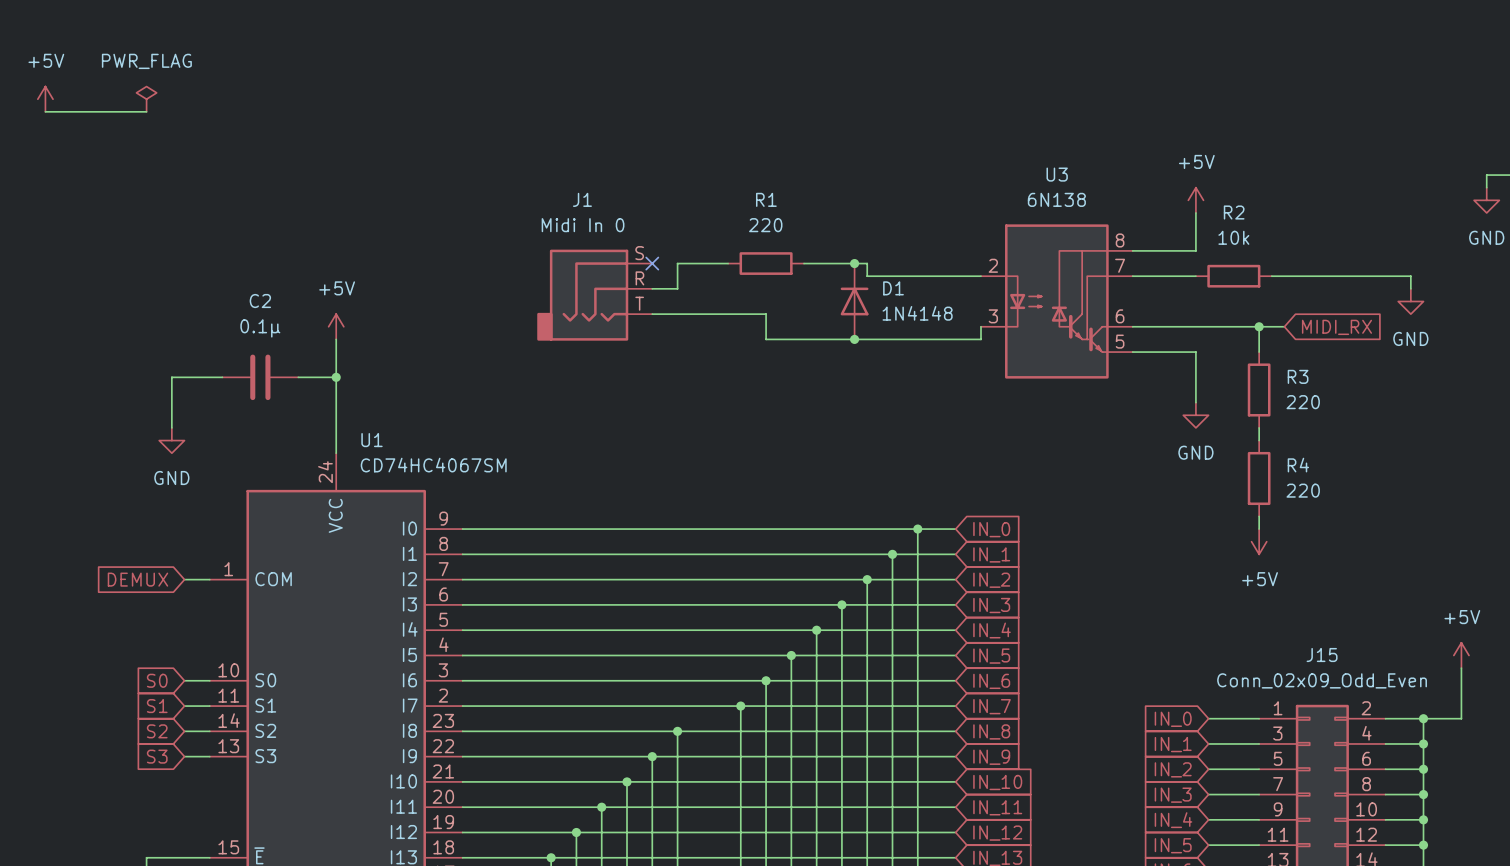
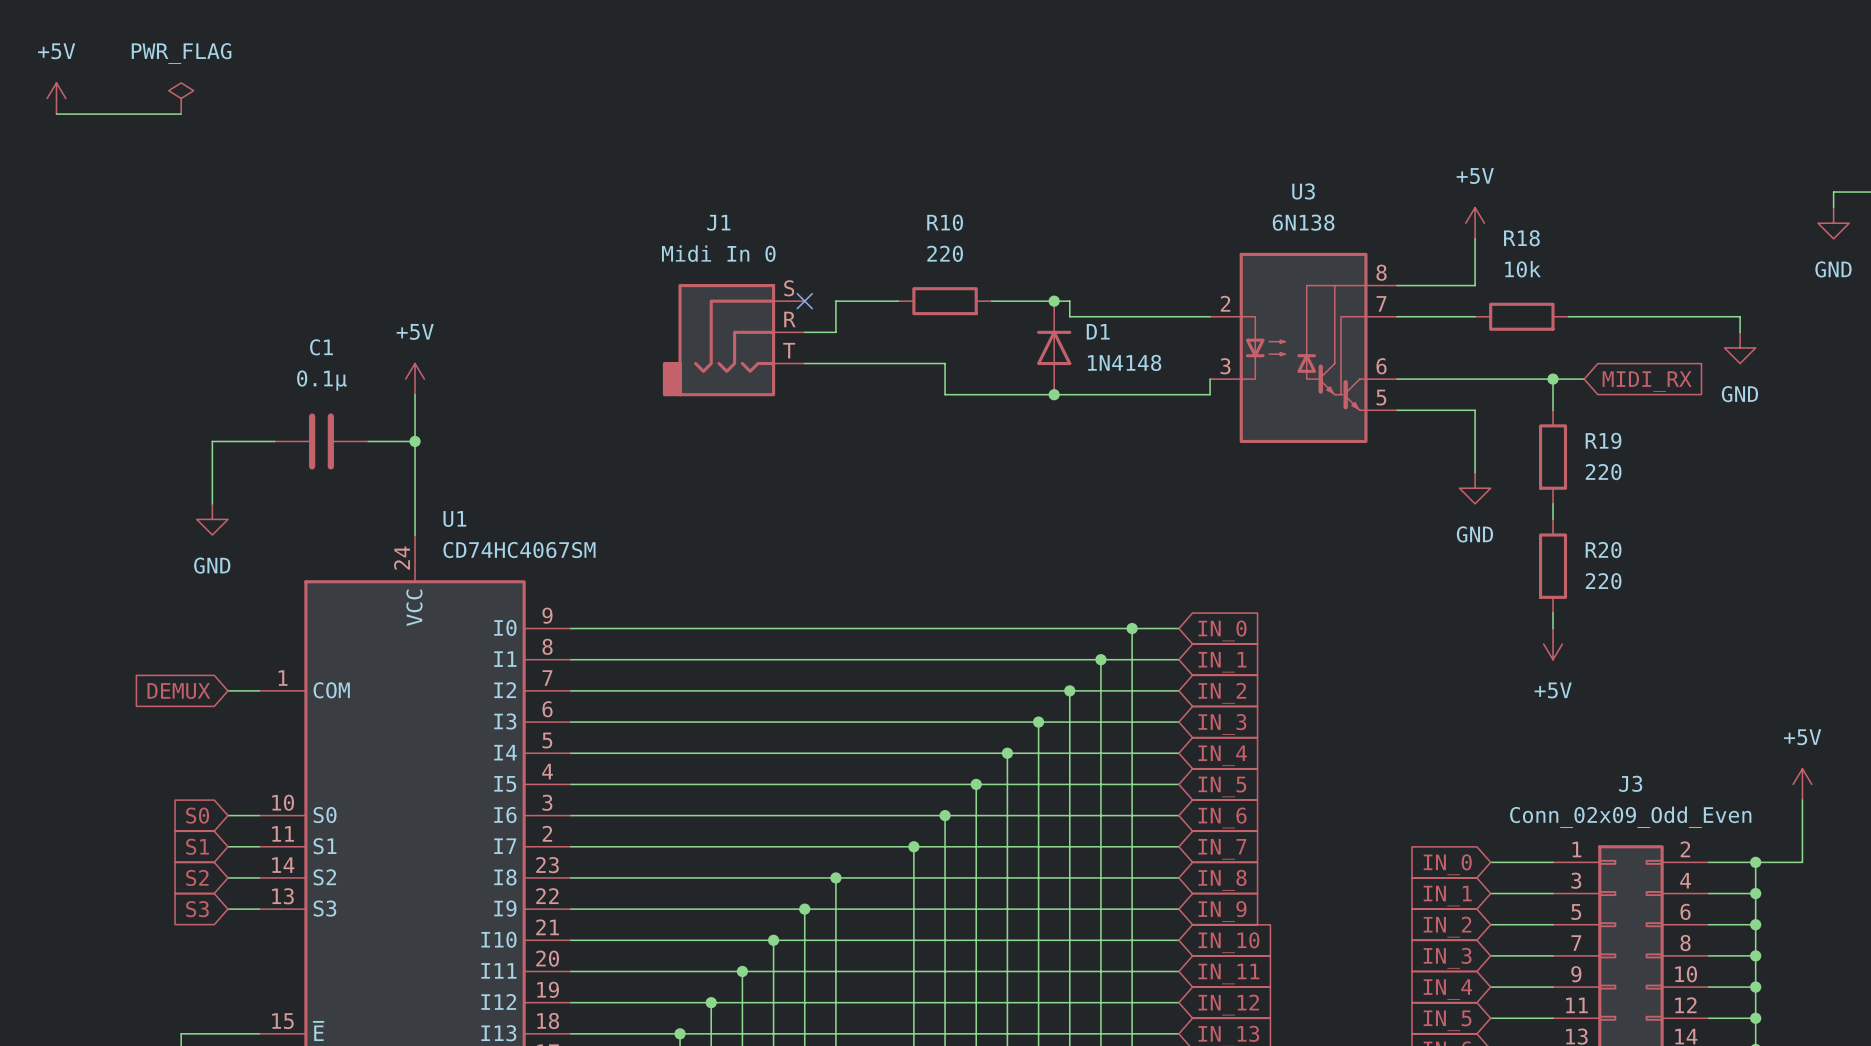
R1 name: R1 (766, 199) -> R10 (945, 222)
R2 name: R2 (1234, 212) -> R18 (1521, 238)
C2 name: C2 (260, 301) -> C1 (321, 347)
R3 name: R3 (1298, 376) -> R19 (1603, 440)
R4 name: R4 (1298, 465) -> R20 (1603, 550)
J15 name: J15 (1322, 655) -> J3 (1630, 783)

